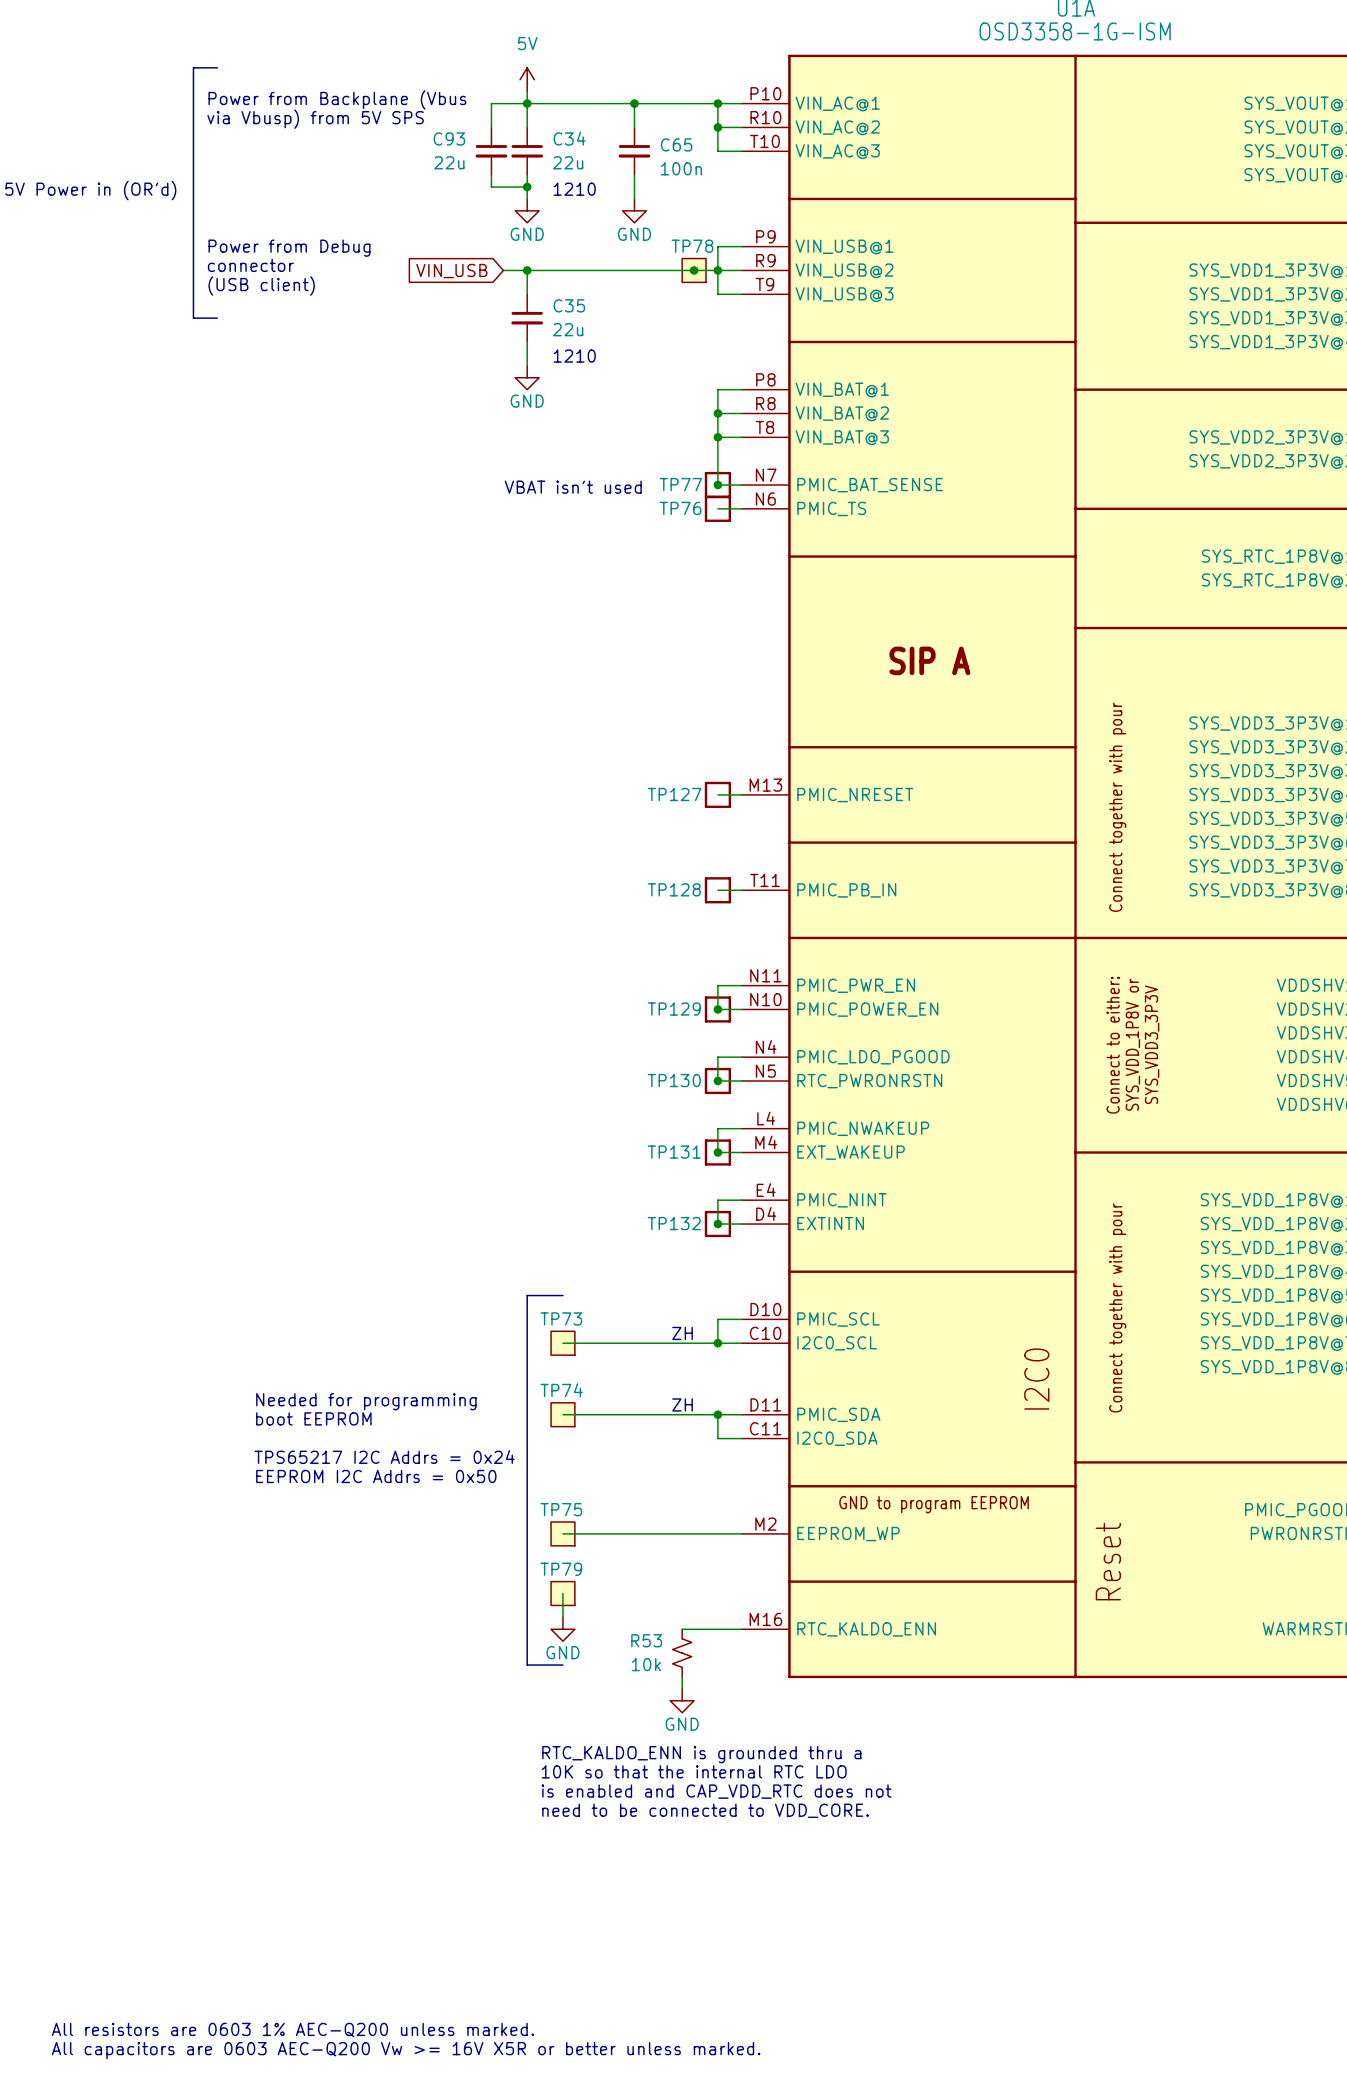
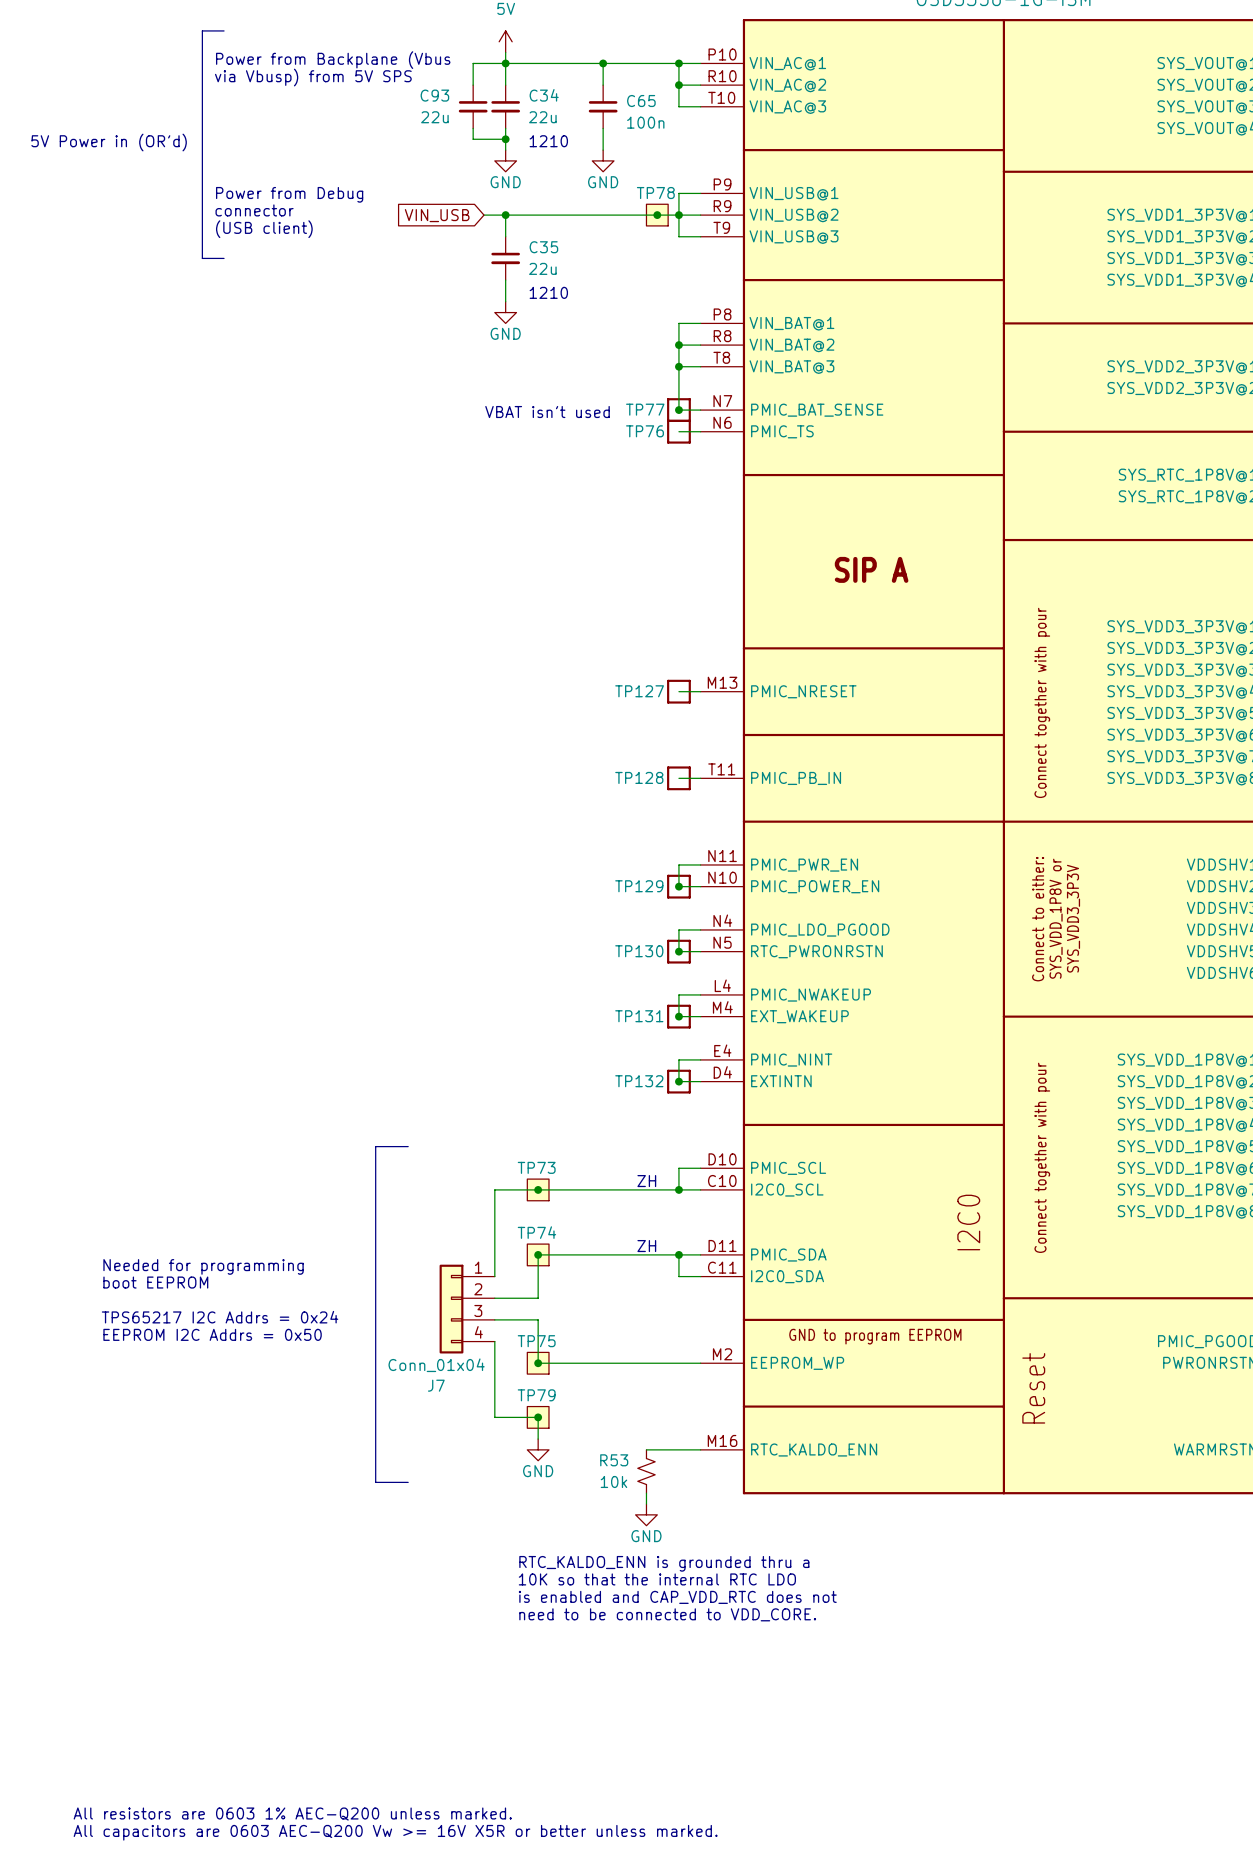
line: (562, 1295) (527, 1295) (527, 1665) (562, 1665) -> (408, 1146) (375, 1146) (375, 1482) (408, 1482)
wire: none -> (538, 1189) (494, 1189) (494, 1276)
junction: none -> (538, 1189)
text position: Needed for programming (366, 1401) -> Needed for programming (203, 1266)
wire: none -> (538, 1254) (538, 1298) (494, 1298)
junction: none -> (538, 1254)
text position: boot EEPROM (313, 1418) -> boot EEPROM (155, 1282)
text position: TPS65217 I2C Addrs = 0x24 (384, 1457) -> TPS65217 I2C Addrs = 0x24 (220, 1317)
J7: none -> Conn_01x04 (467, 1309)
text position: EEPROM I2C Addrs = 0x50 (376, 1476) -> EEPROM I2C Addrs = 0x50 (212, 1334)
wire: none -> (494, 1319) (538, 1319) (538, 1363)
wire: none -> (494, 1341) (494, 1417) (538, 1417)
junction: none -> (538, 1363)
junction: none -> (538, 1417)

